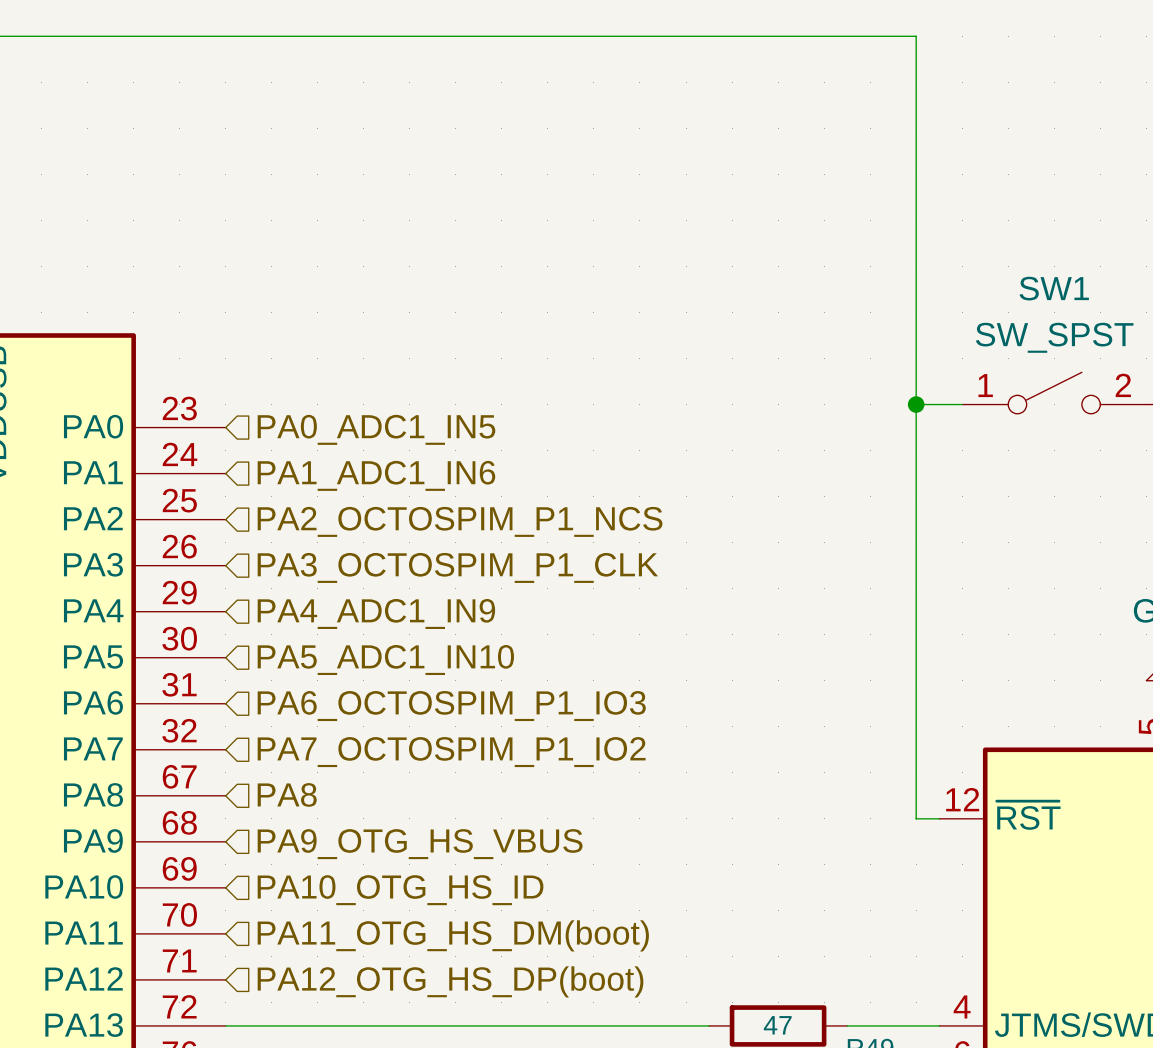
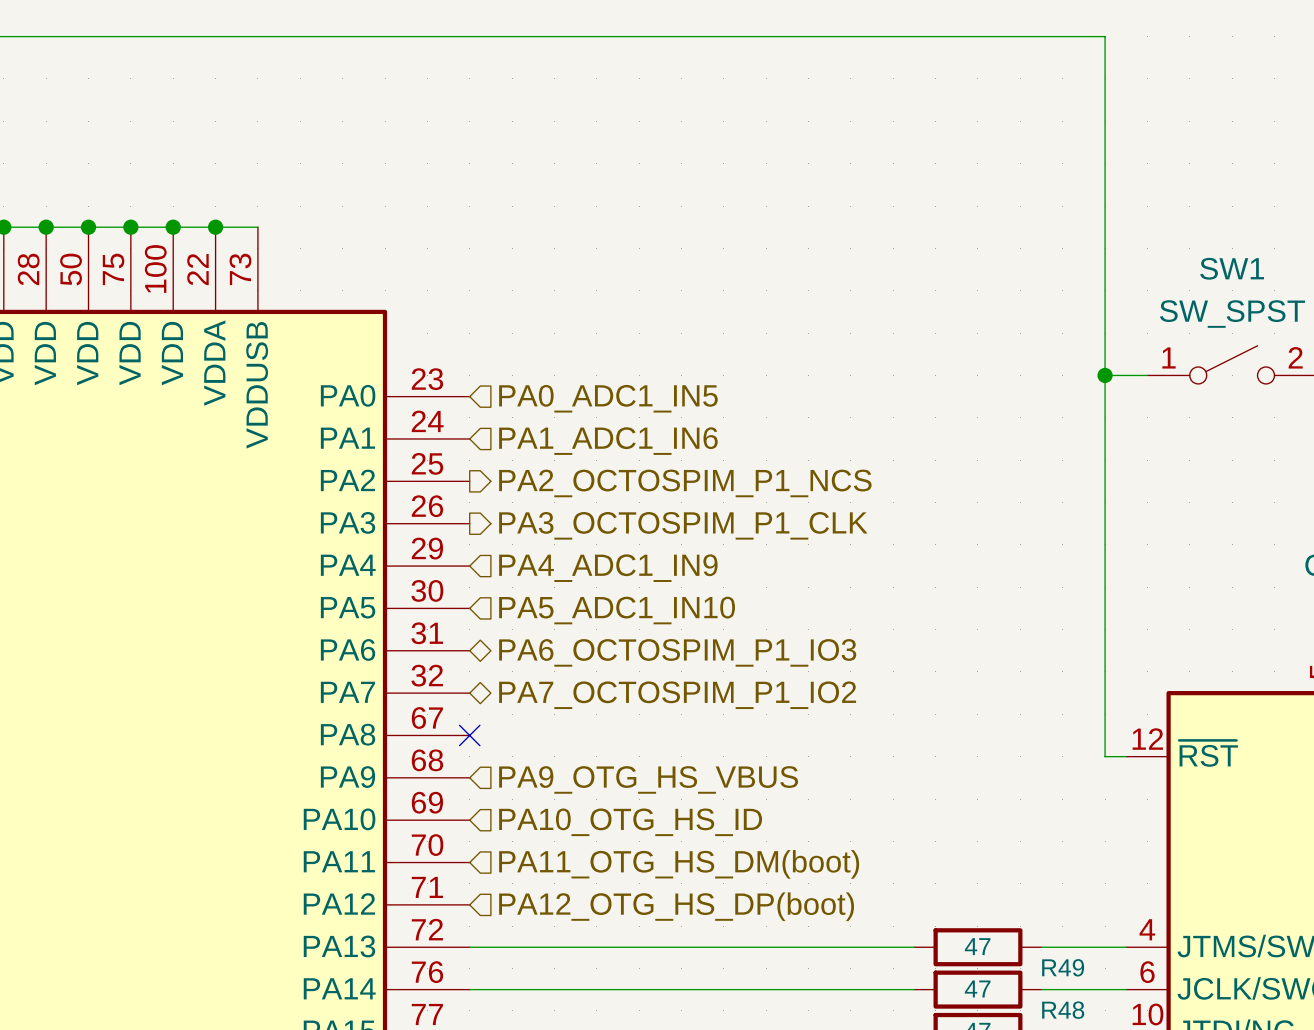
hierarchical label shape: input (460, 521) -> output (685, 483)
hierarchical label shape: input (457, 567) -> output (683, 525)
hierarchical label shape: input (451, 706) -> bidirectional (677, 652)
hierarchical label shape: input (451, 752) -> bidirectional (677, 695)
hierarchical label: PA8 (287, 794) -> none
no-connect mark: none -> (469, 735)

